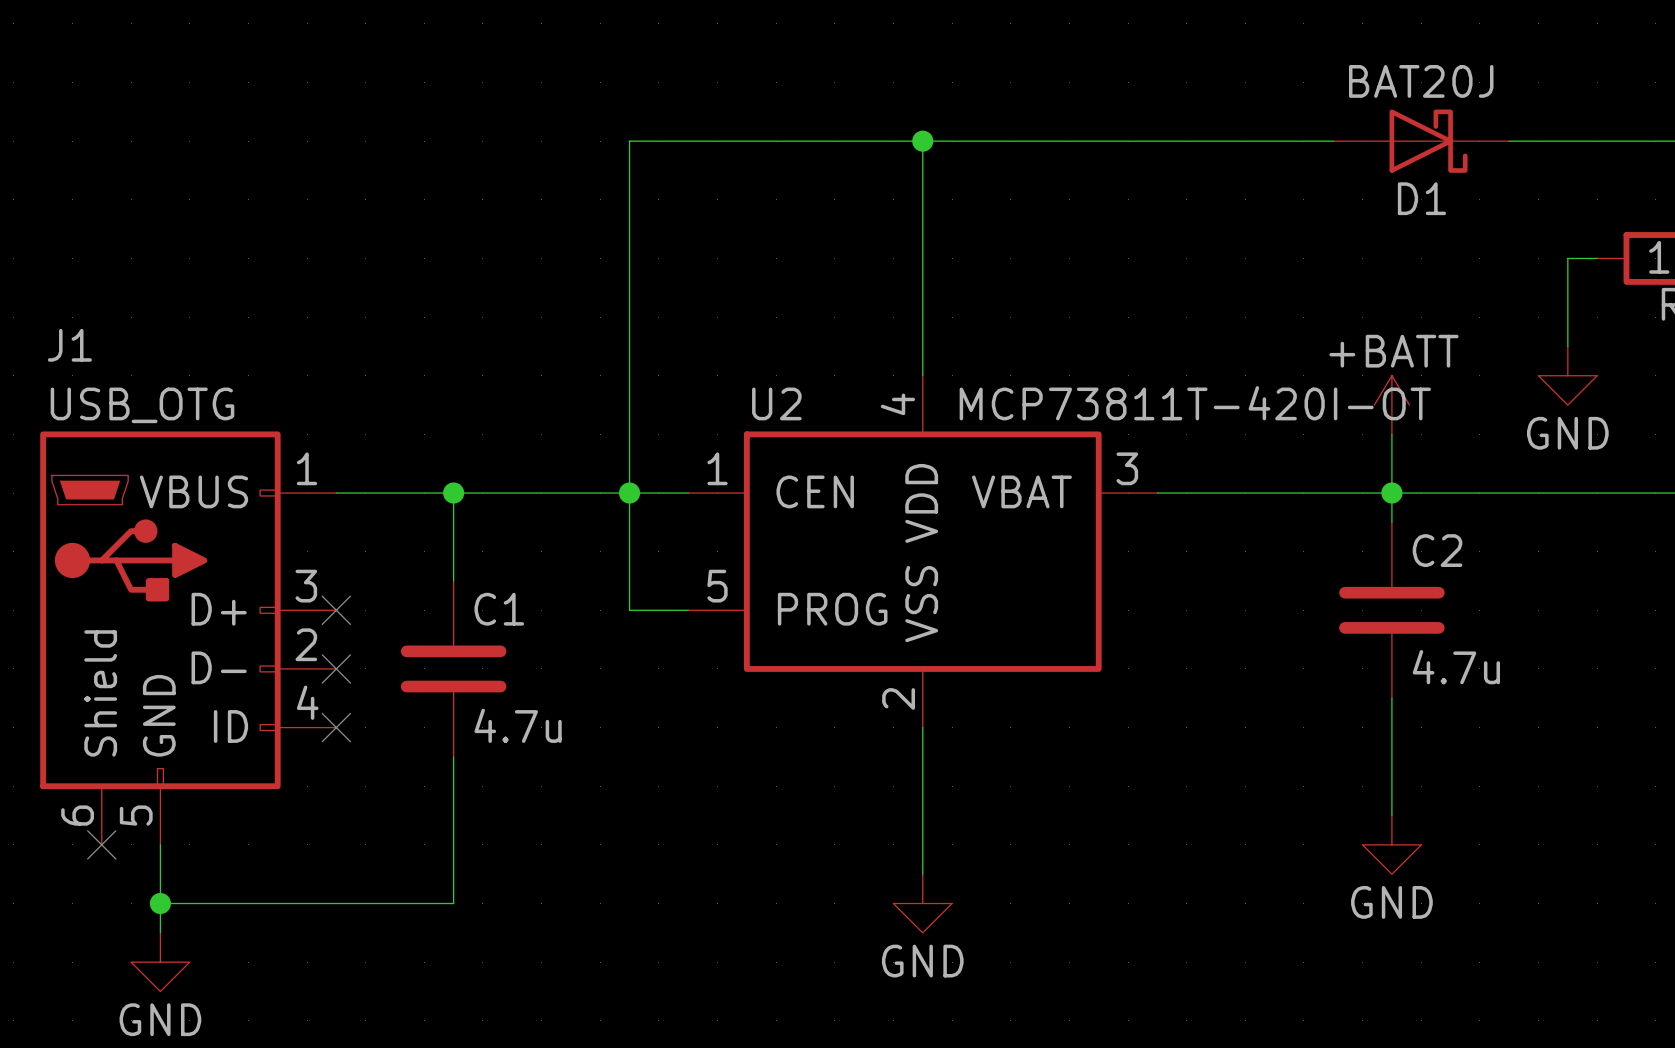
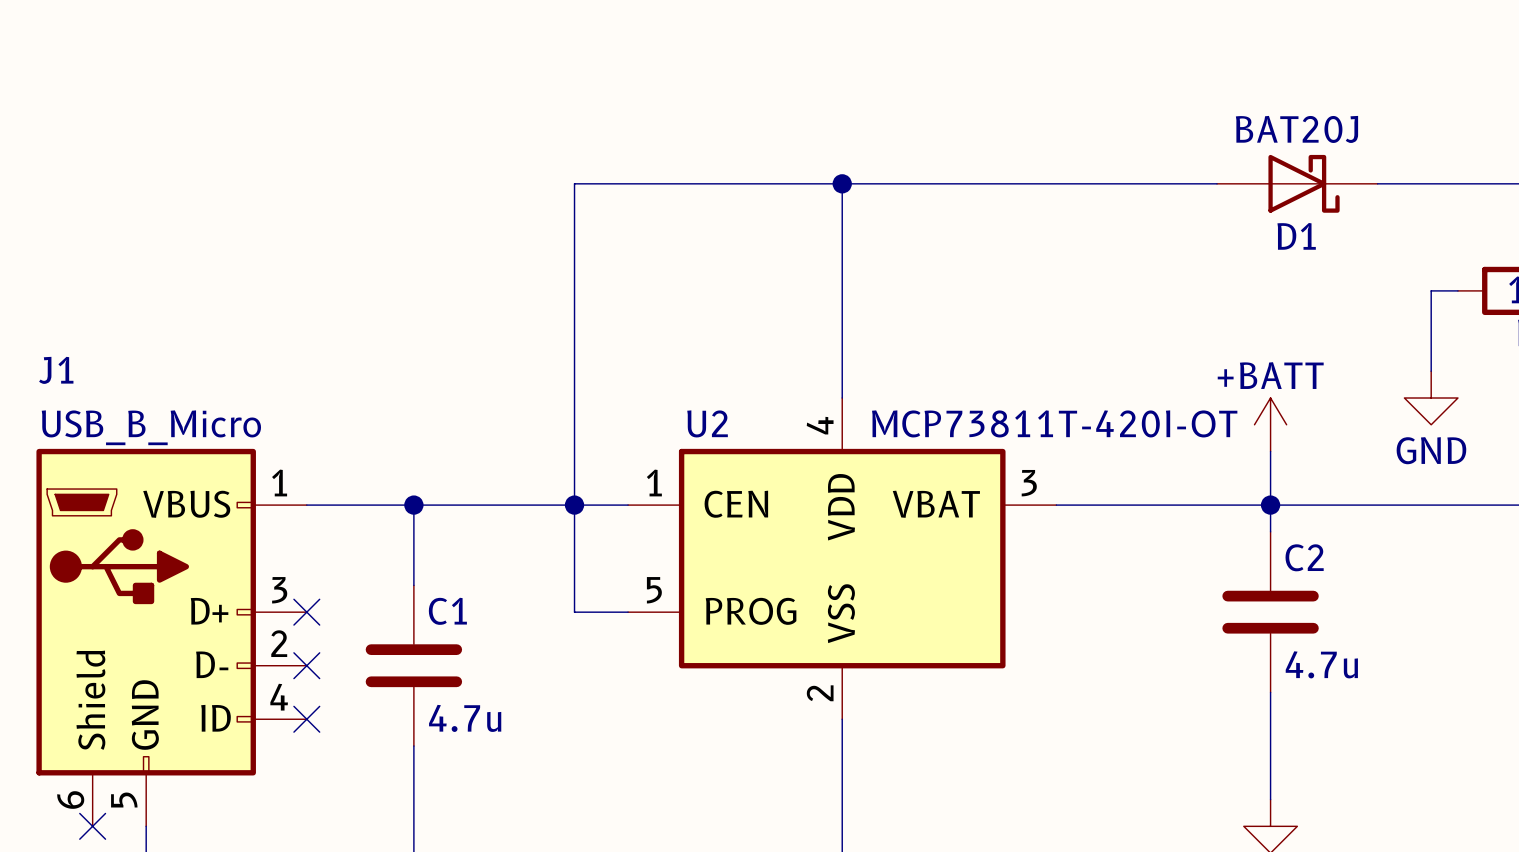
J1 value: USB_OTG (142, 405) -> USB_B_Micro (151, 427)

